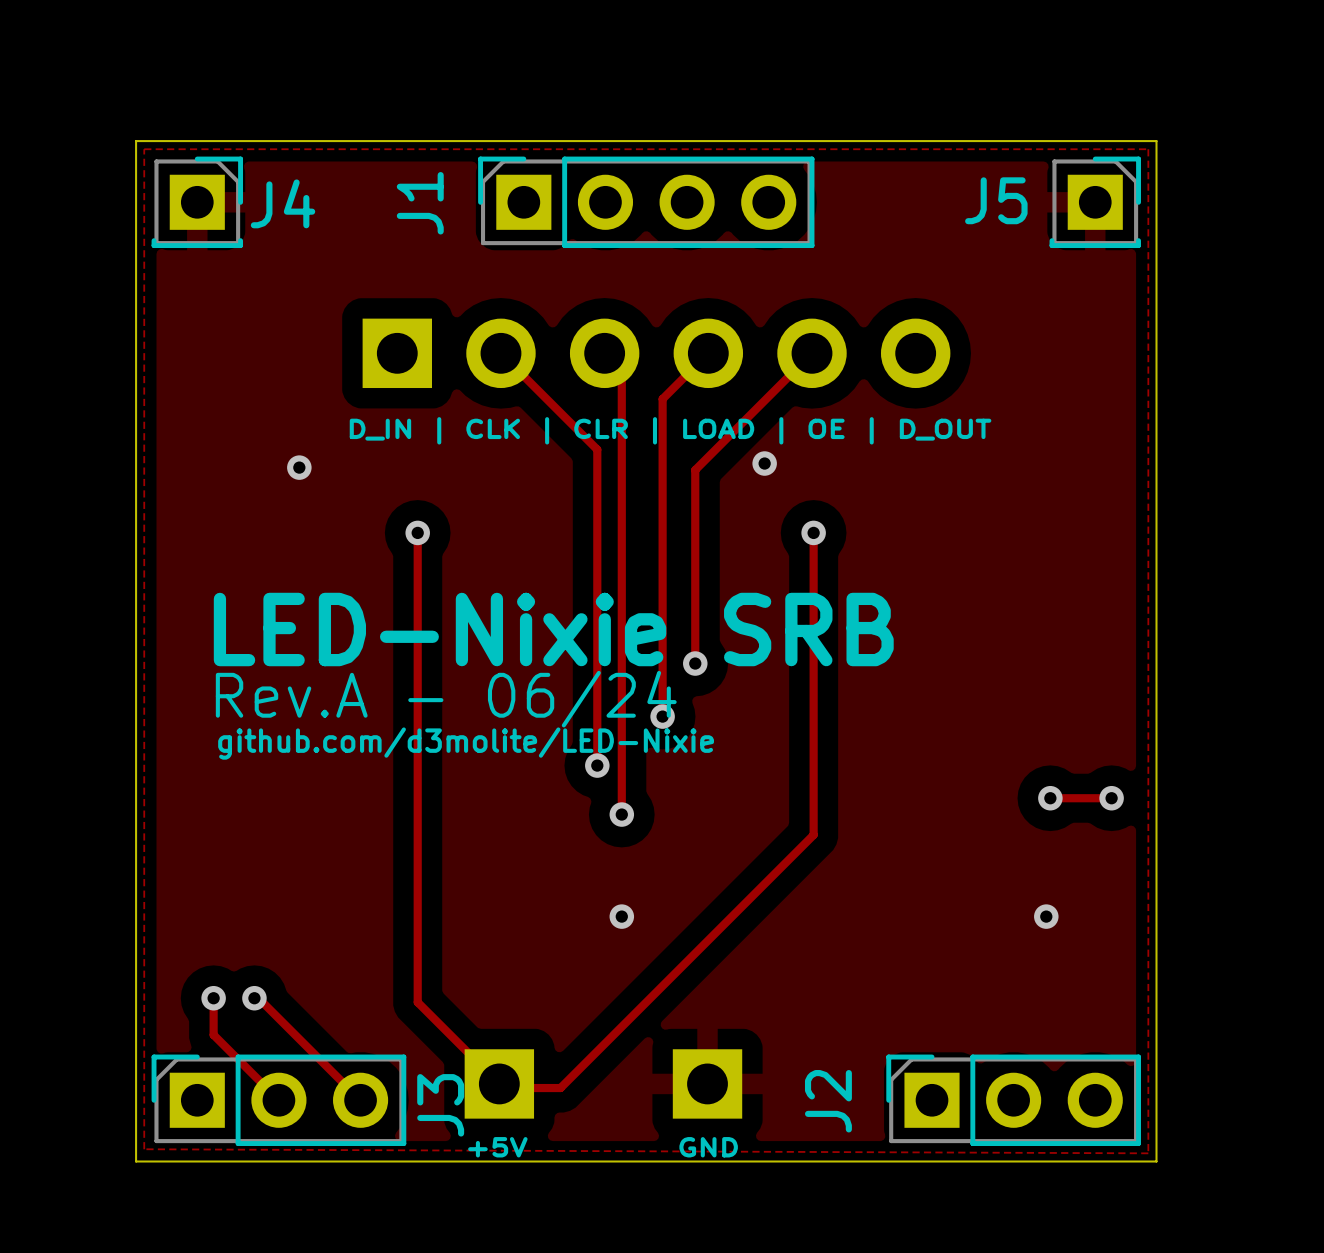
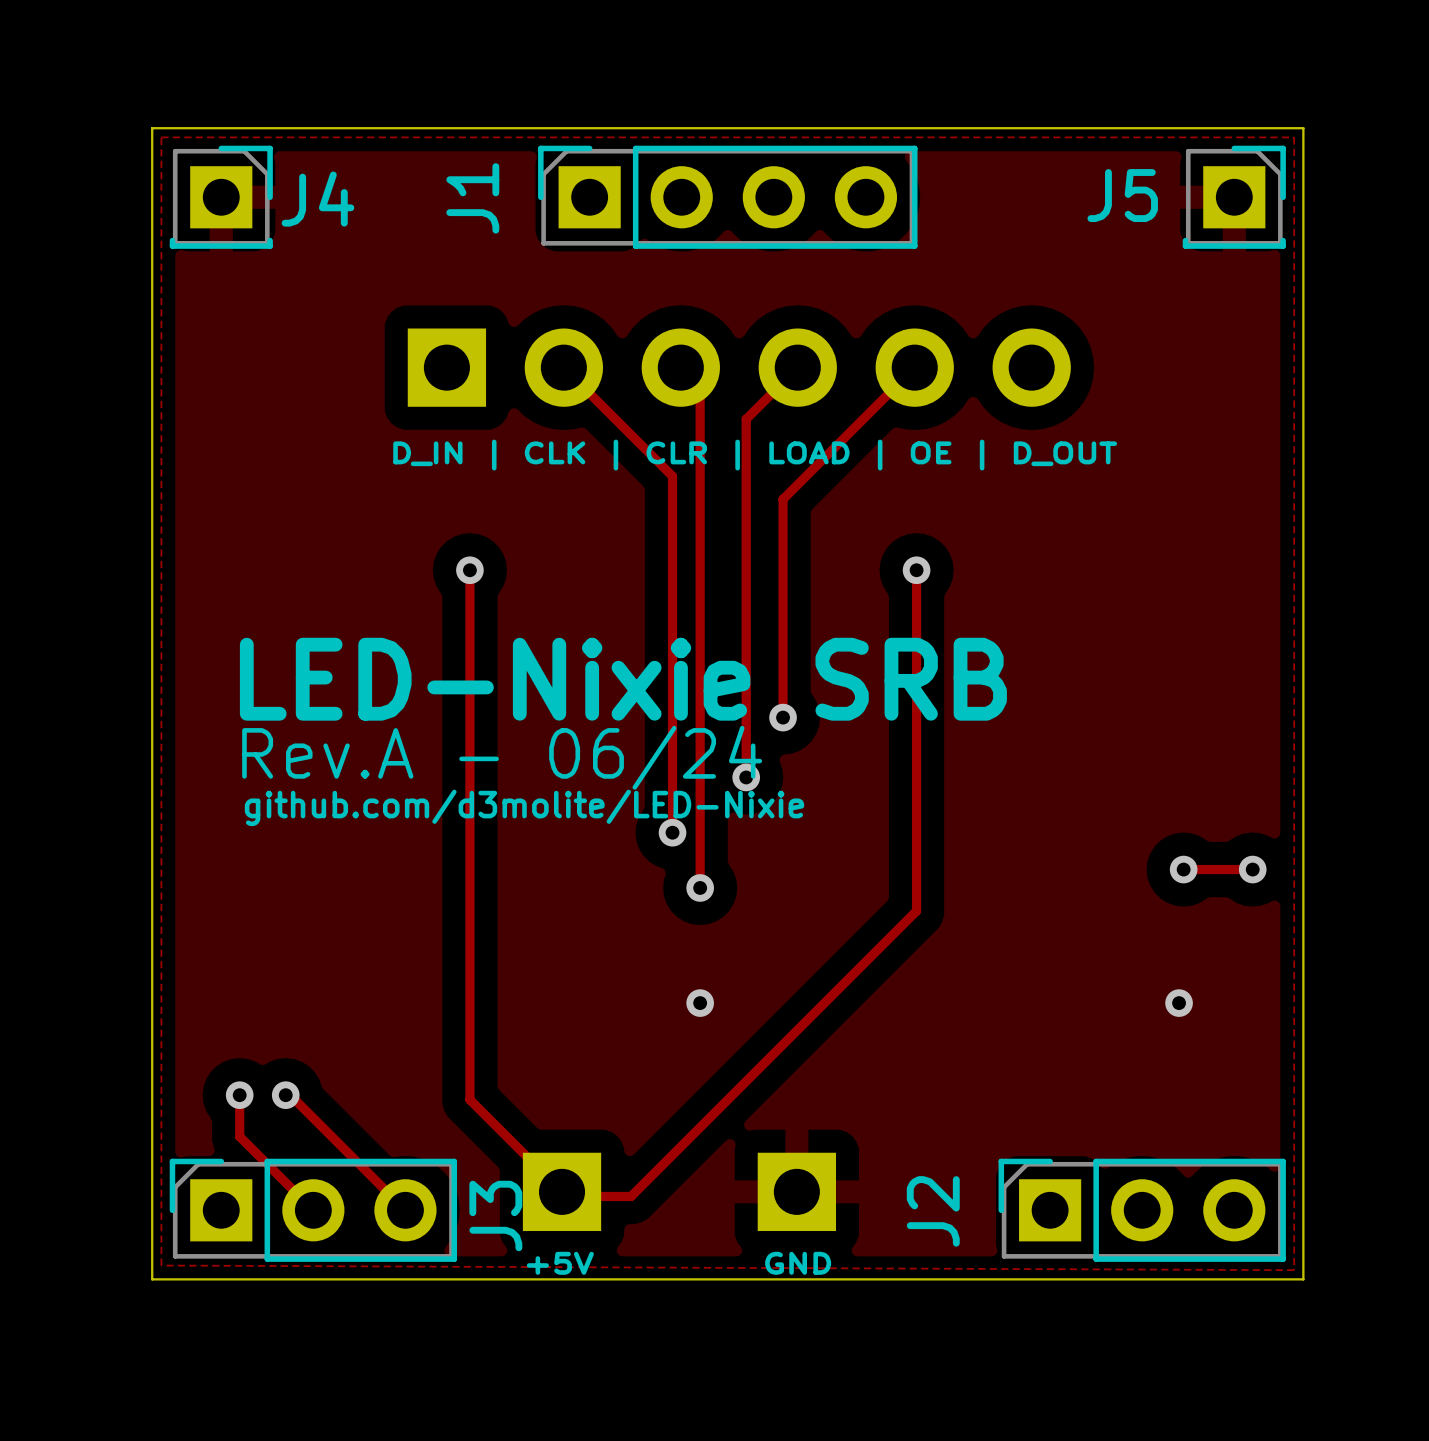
via: (764, 463) -> none
via: (299, 467) -> none

